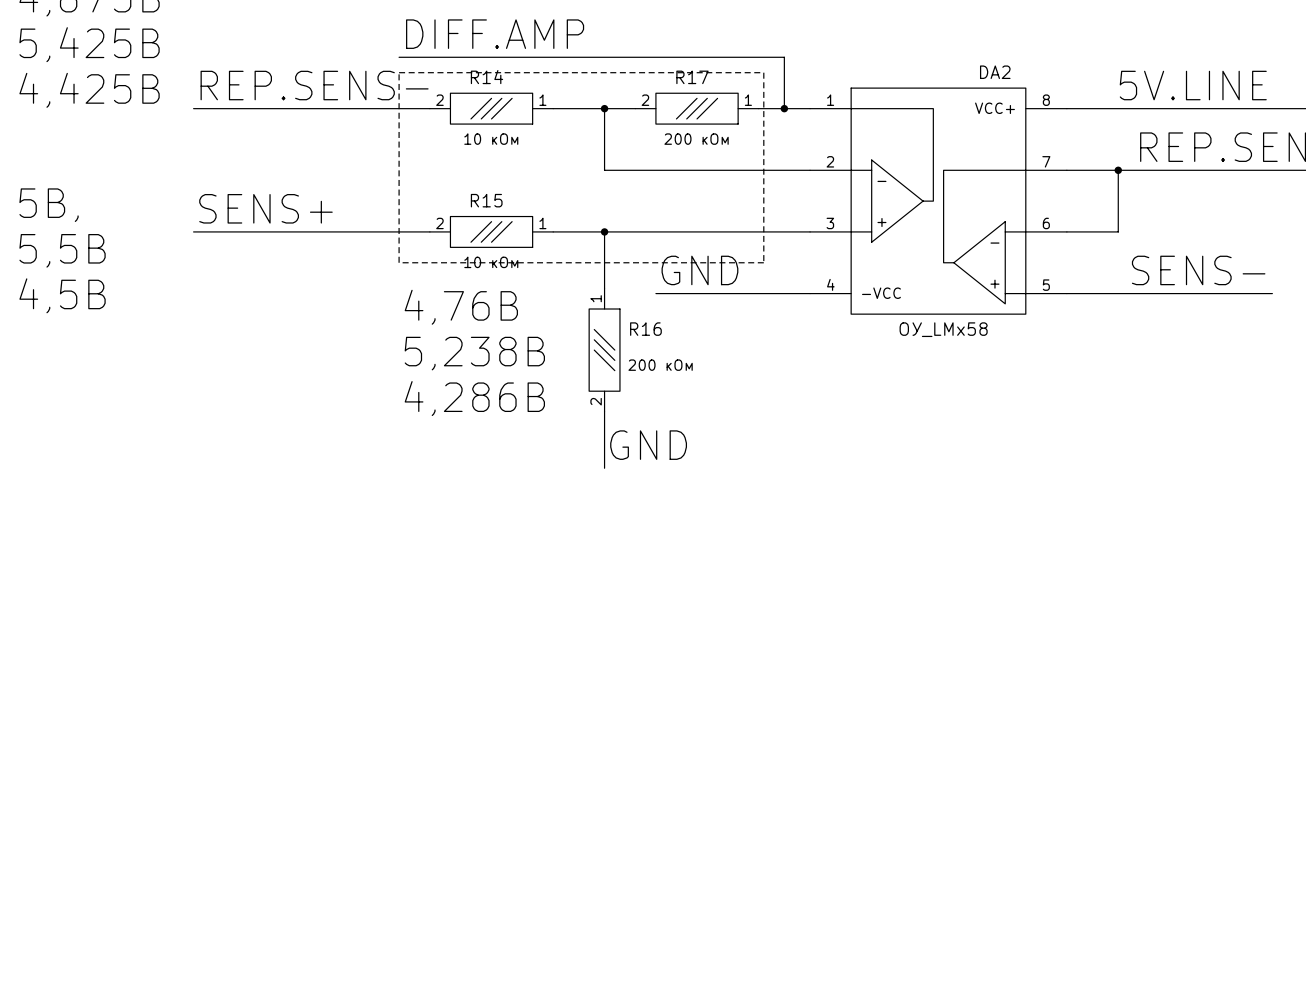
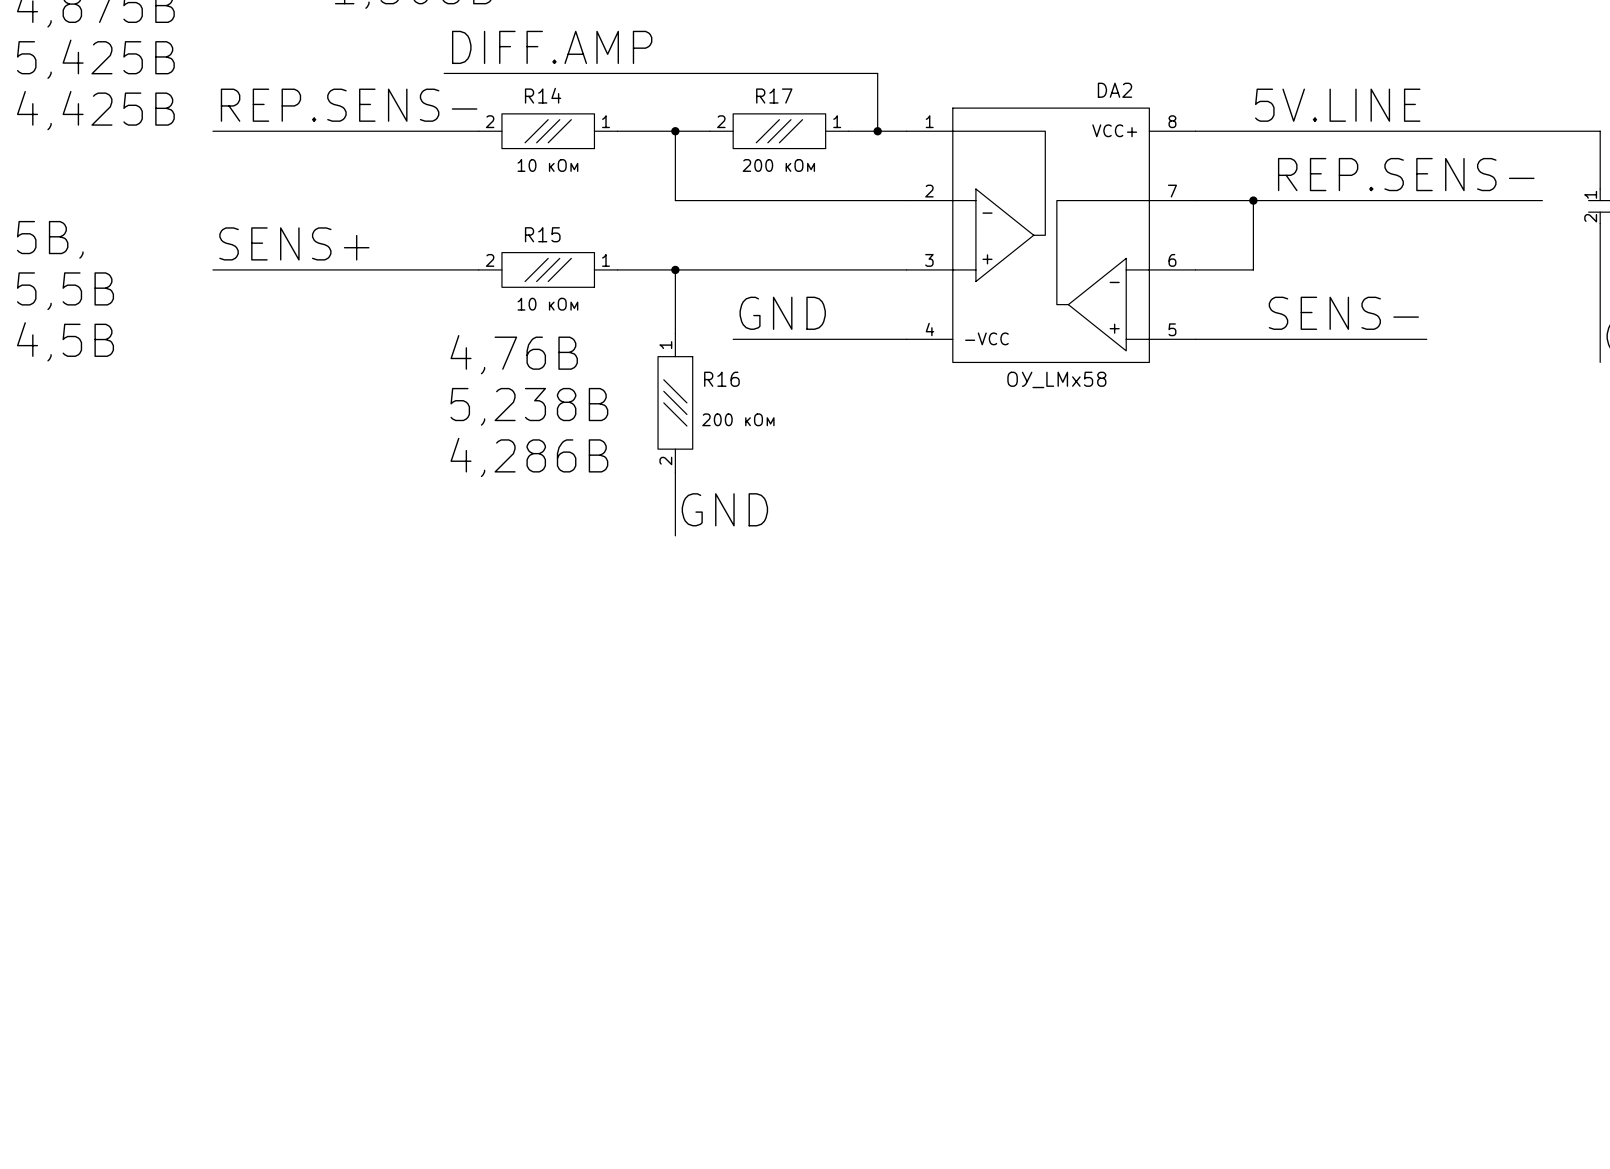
line: (399, 72) (763, 72) (763, 262) (399, 262) (399, 72) -> none

